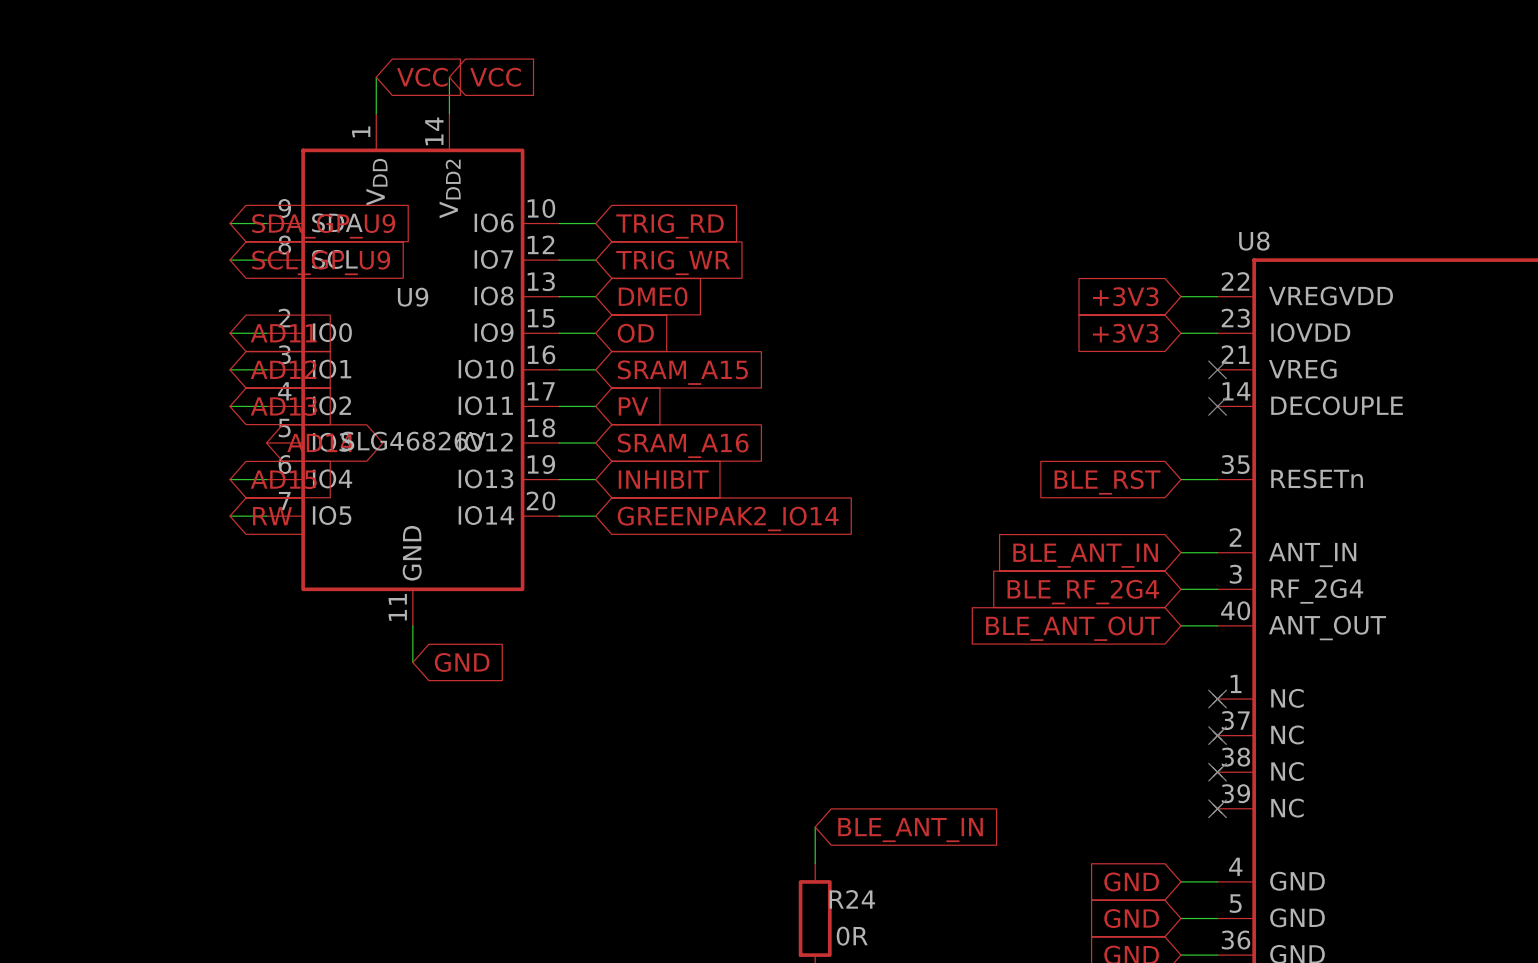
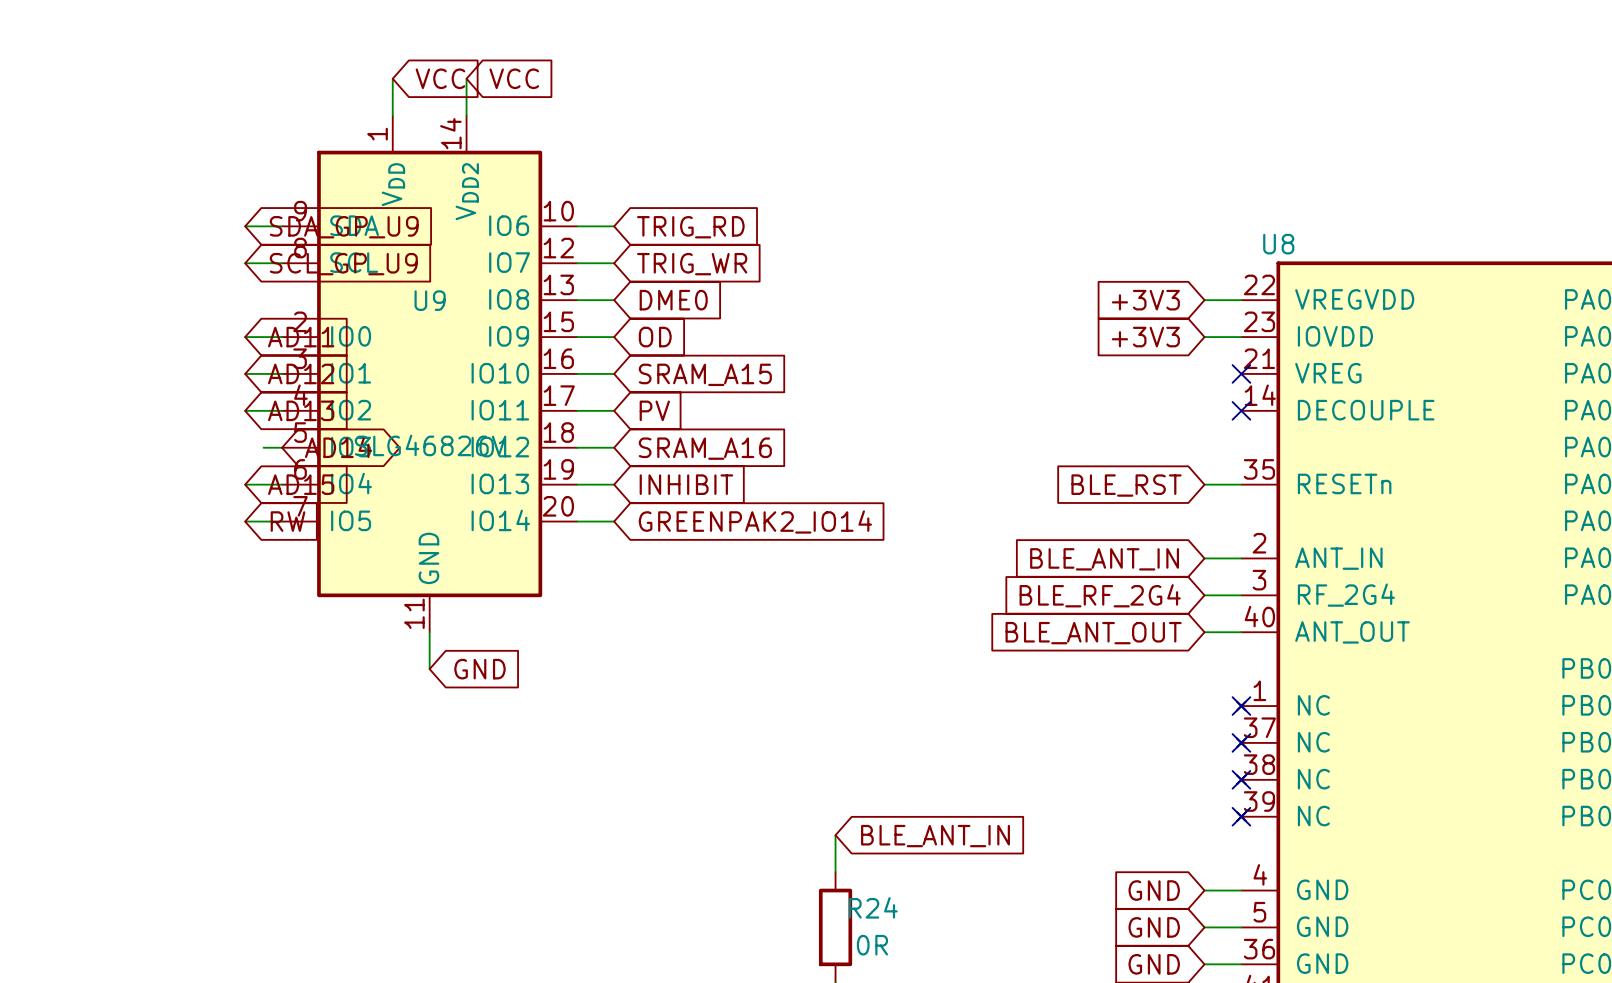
wire: none -> (263, 447) (282, 447)

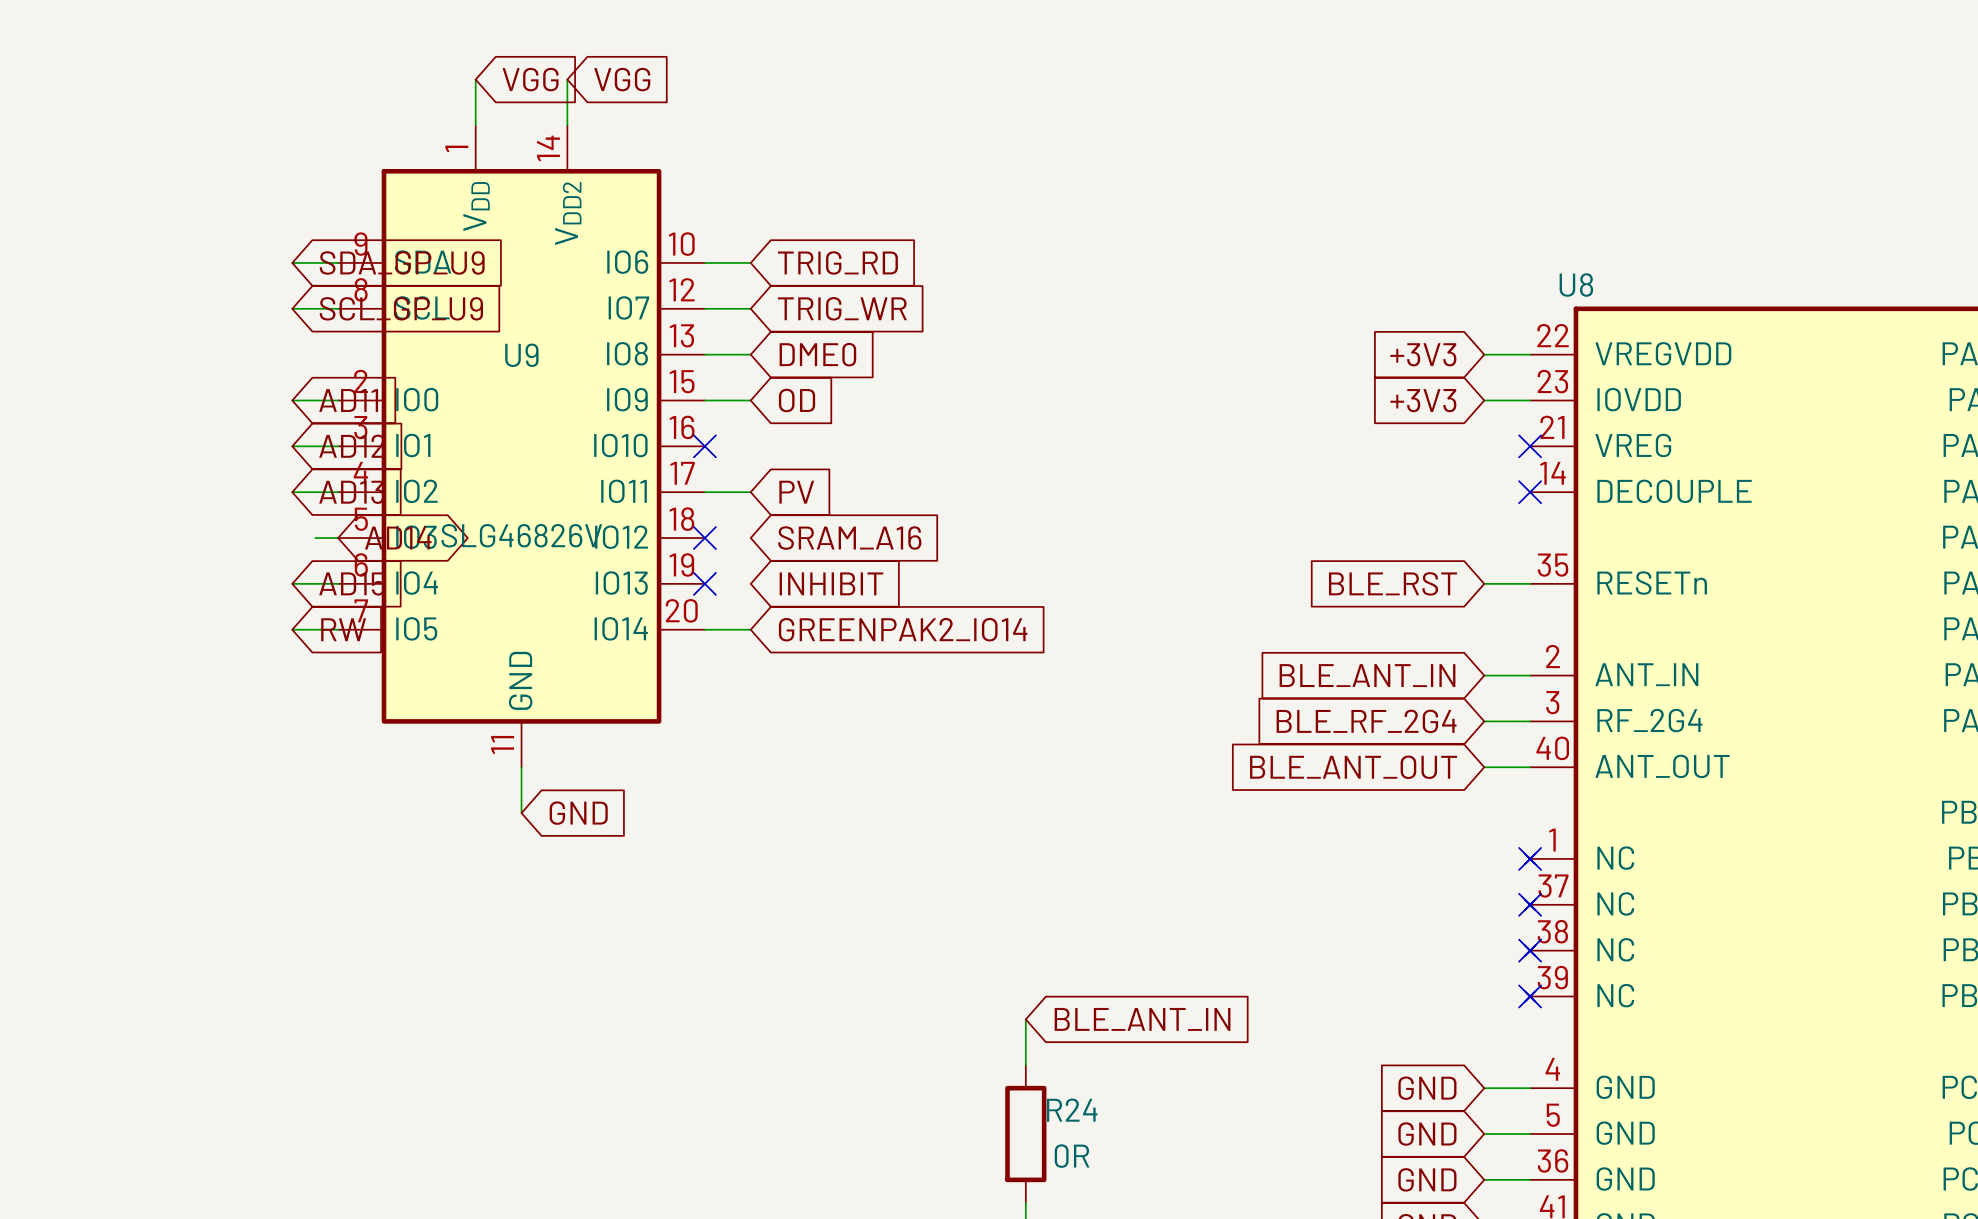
global label: VCC (440, 78) -> VGG (530, 79)
global label: VCC (514, 78) -> VGG (622, 79)
wire: (577, 373) (614, 373) -> none
no-connect mark: none -> (704, 446)
global label: SRAM_A15 (705, 374) -> none
wire: (577, 447) (614, 447) -> none
no-connect mark: none -> (704, 538)
wire: (577, 484) (614, 484) -> none
no-connect mark: none -> (704, 583)

